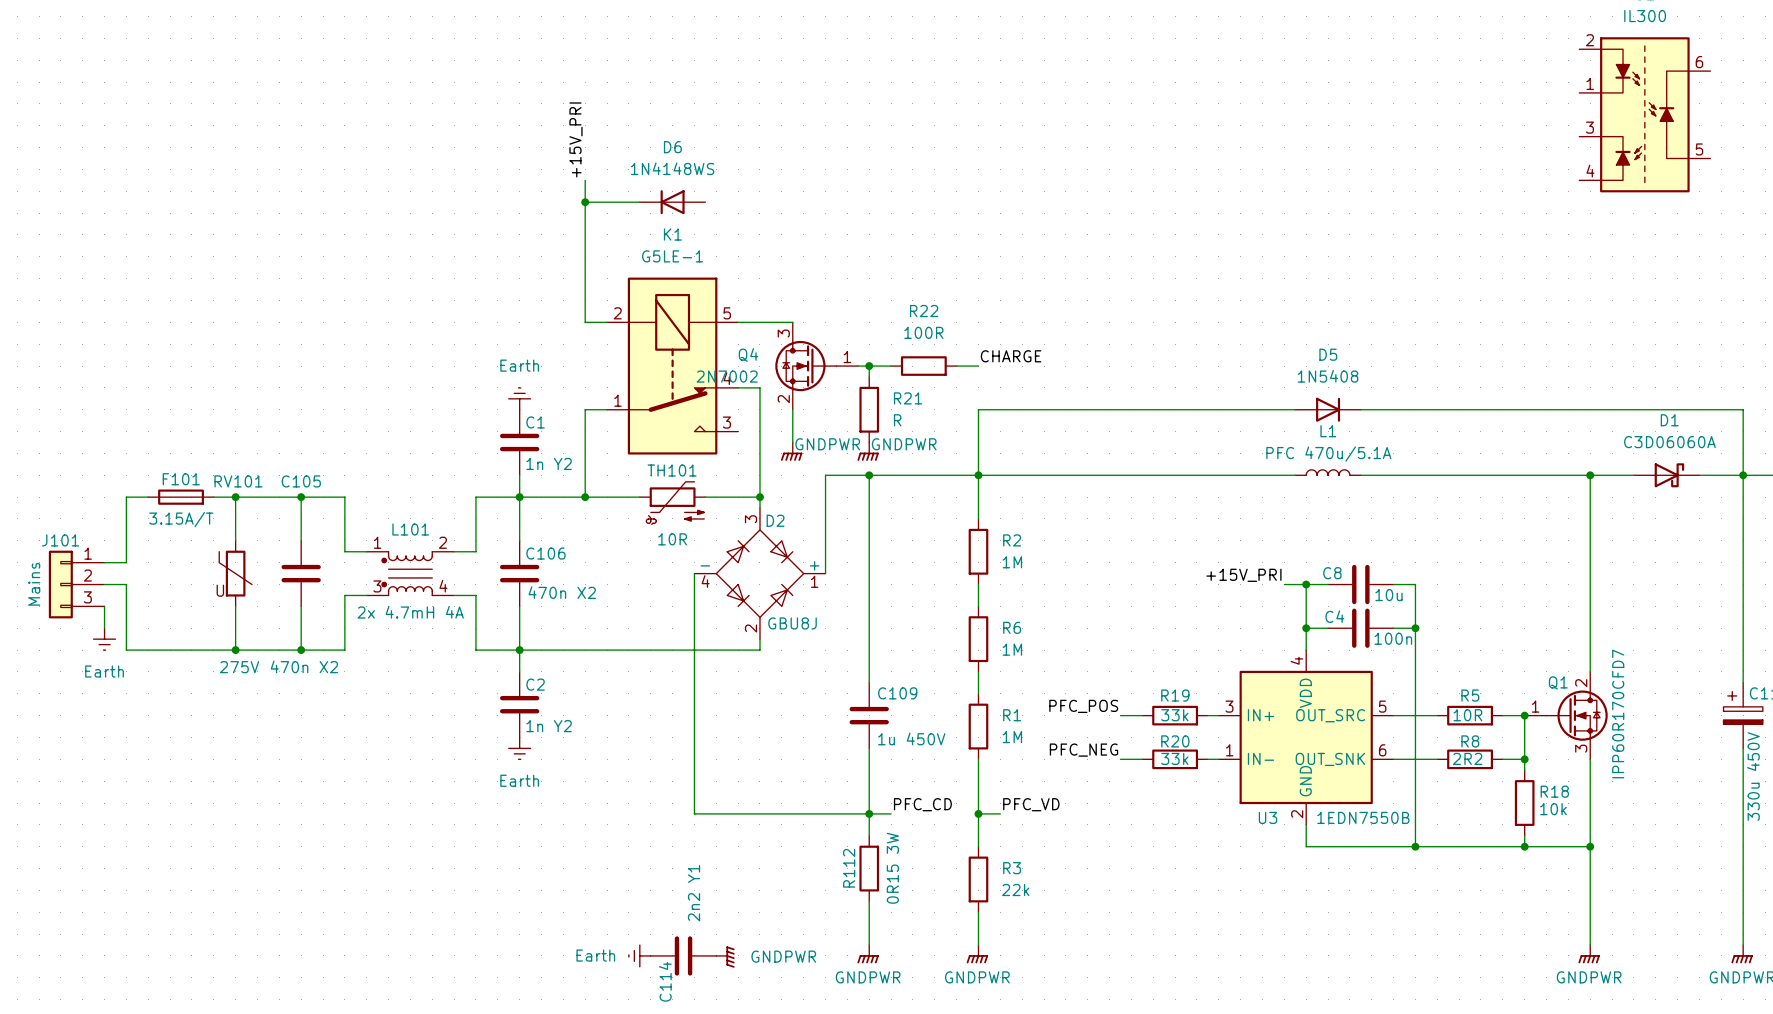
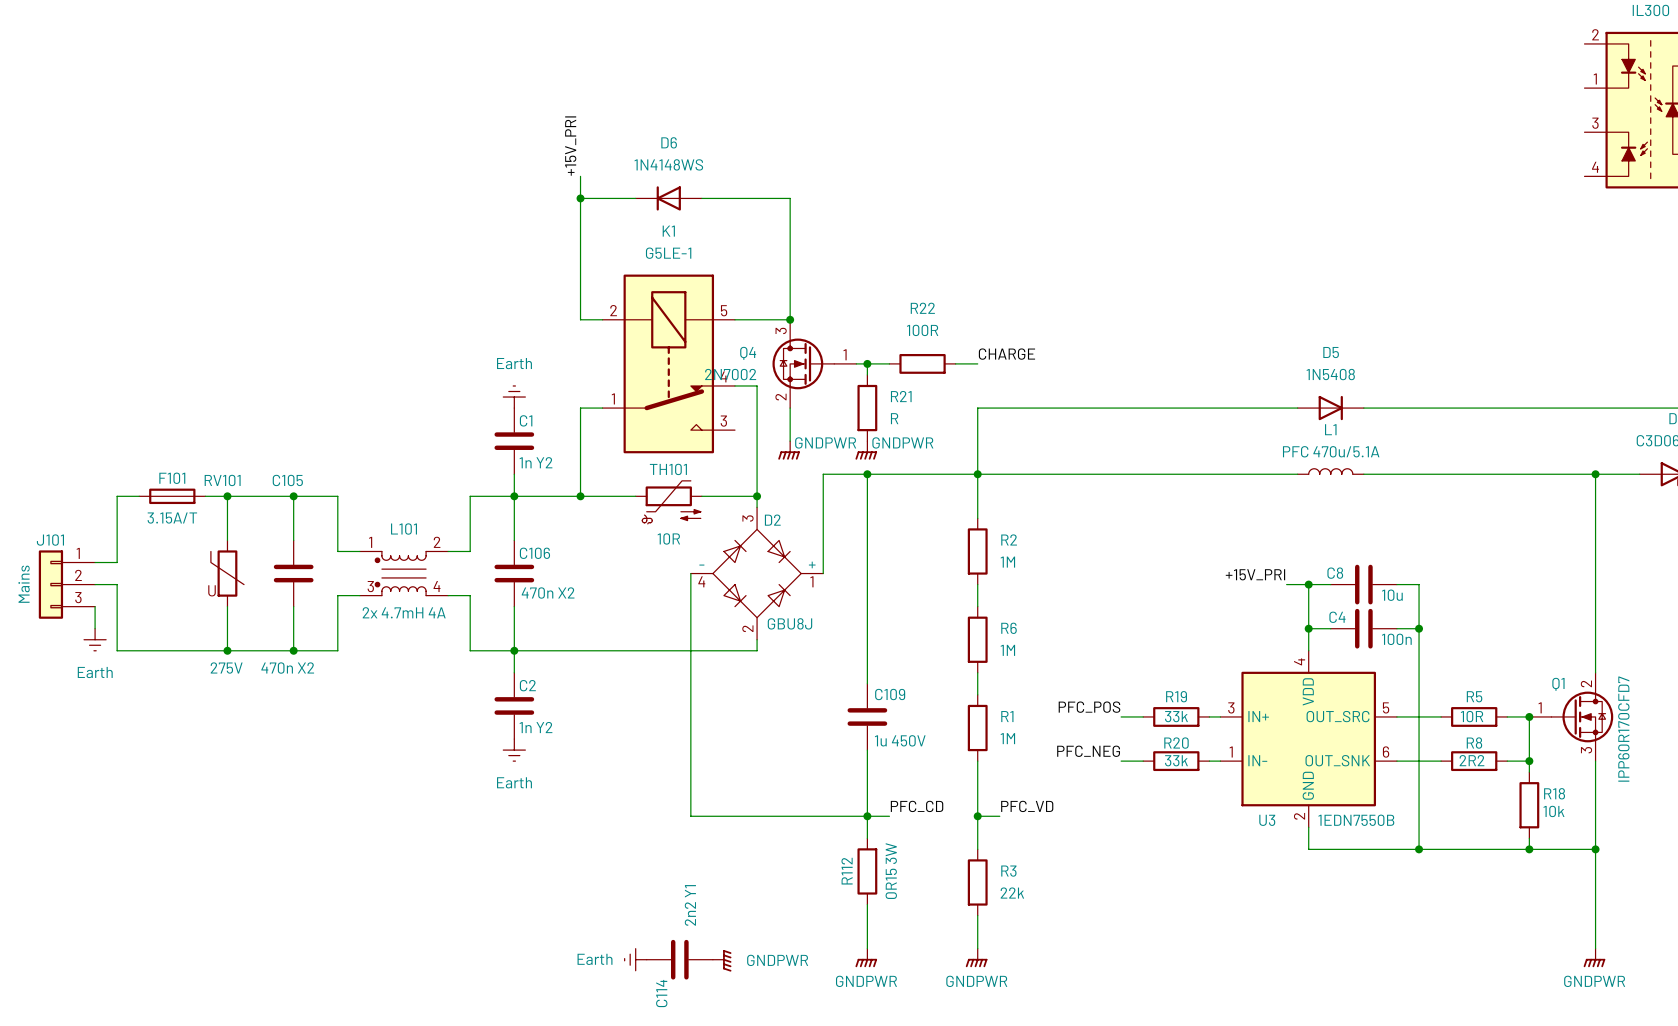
wire: none -> (701, 198) (790, 198) (790, 319)
junction: none -> (790, 319)

